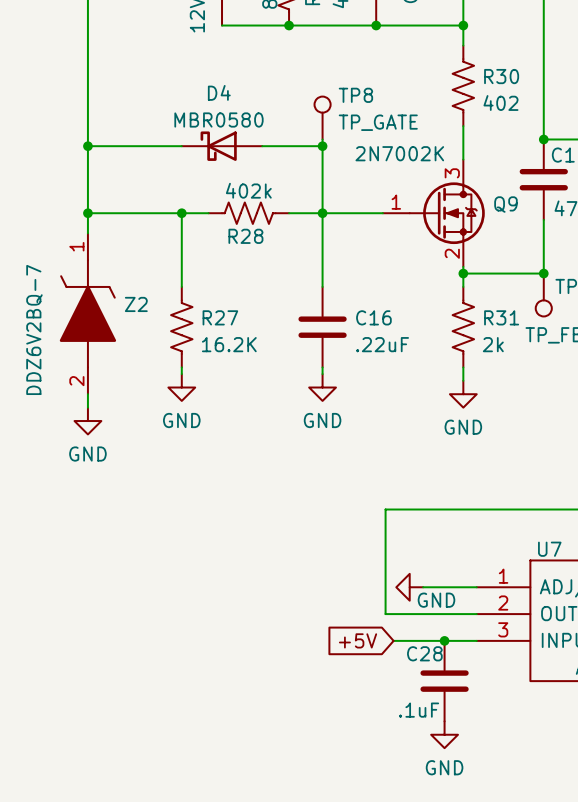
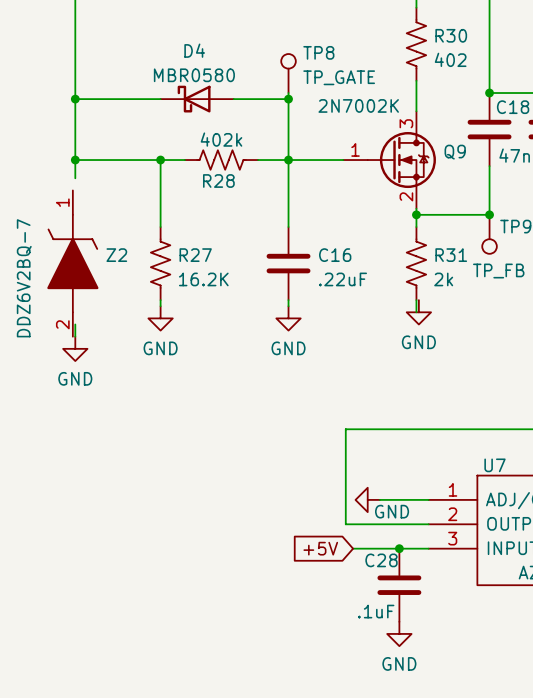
Z2 position: (87, 313) -> (72, 263)
power symbol position: GND (463, 394) -> GND (418, 312)

